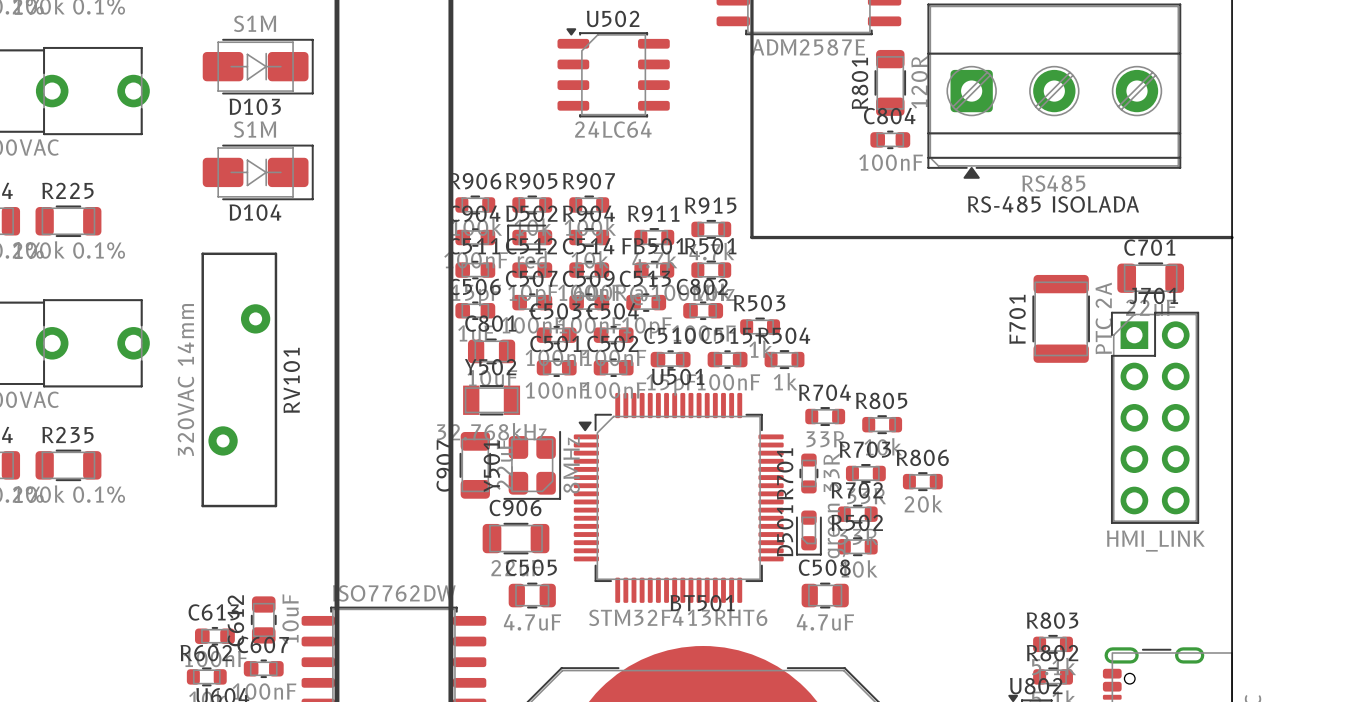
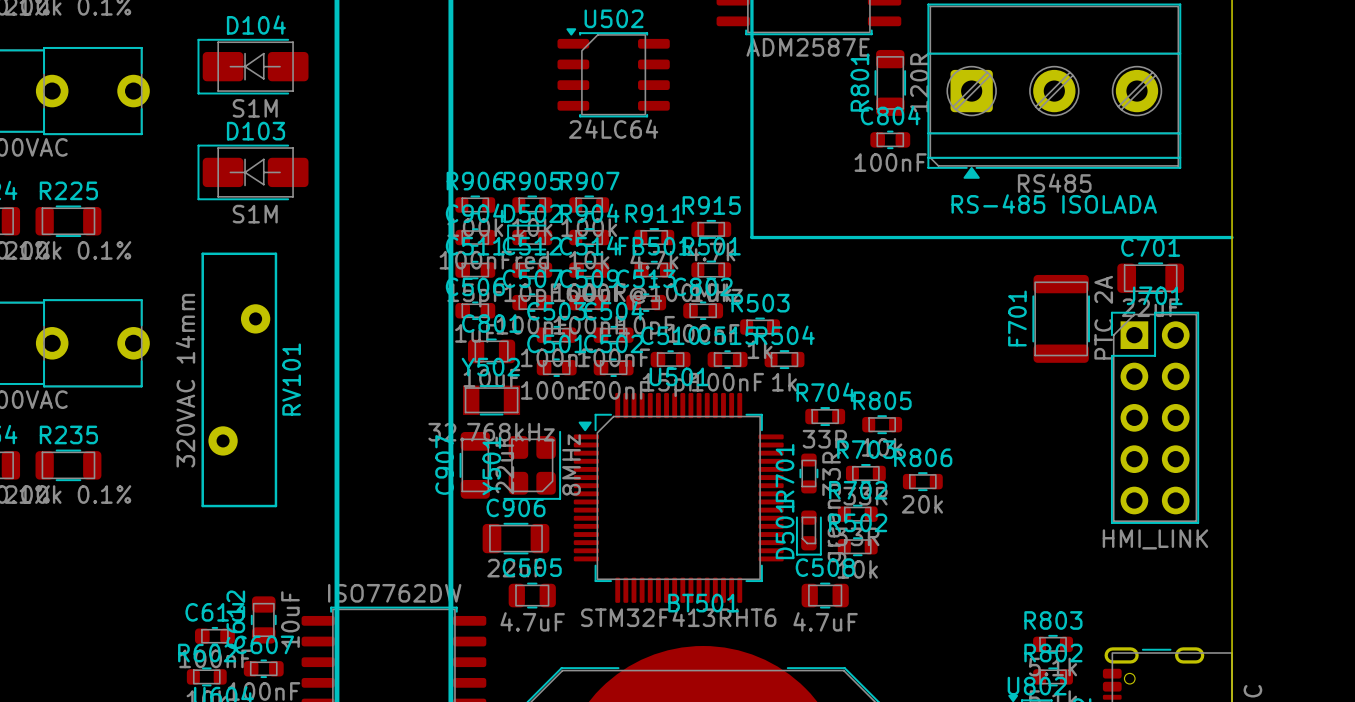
D103 rotation: 0° (258, 66) -> 180° (253, 172)
D103 position: (258, 66) -> (253, 172)
D104 rotation: 0° (258, 172) -> 180° (253, 66)
D104 position: (258, 172) -> (253, 66)

